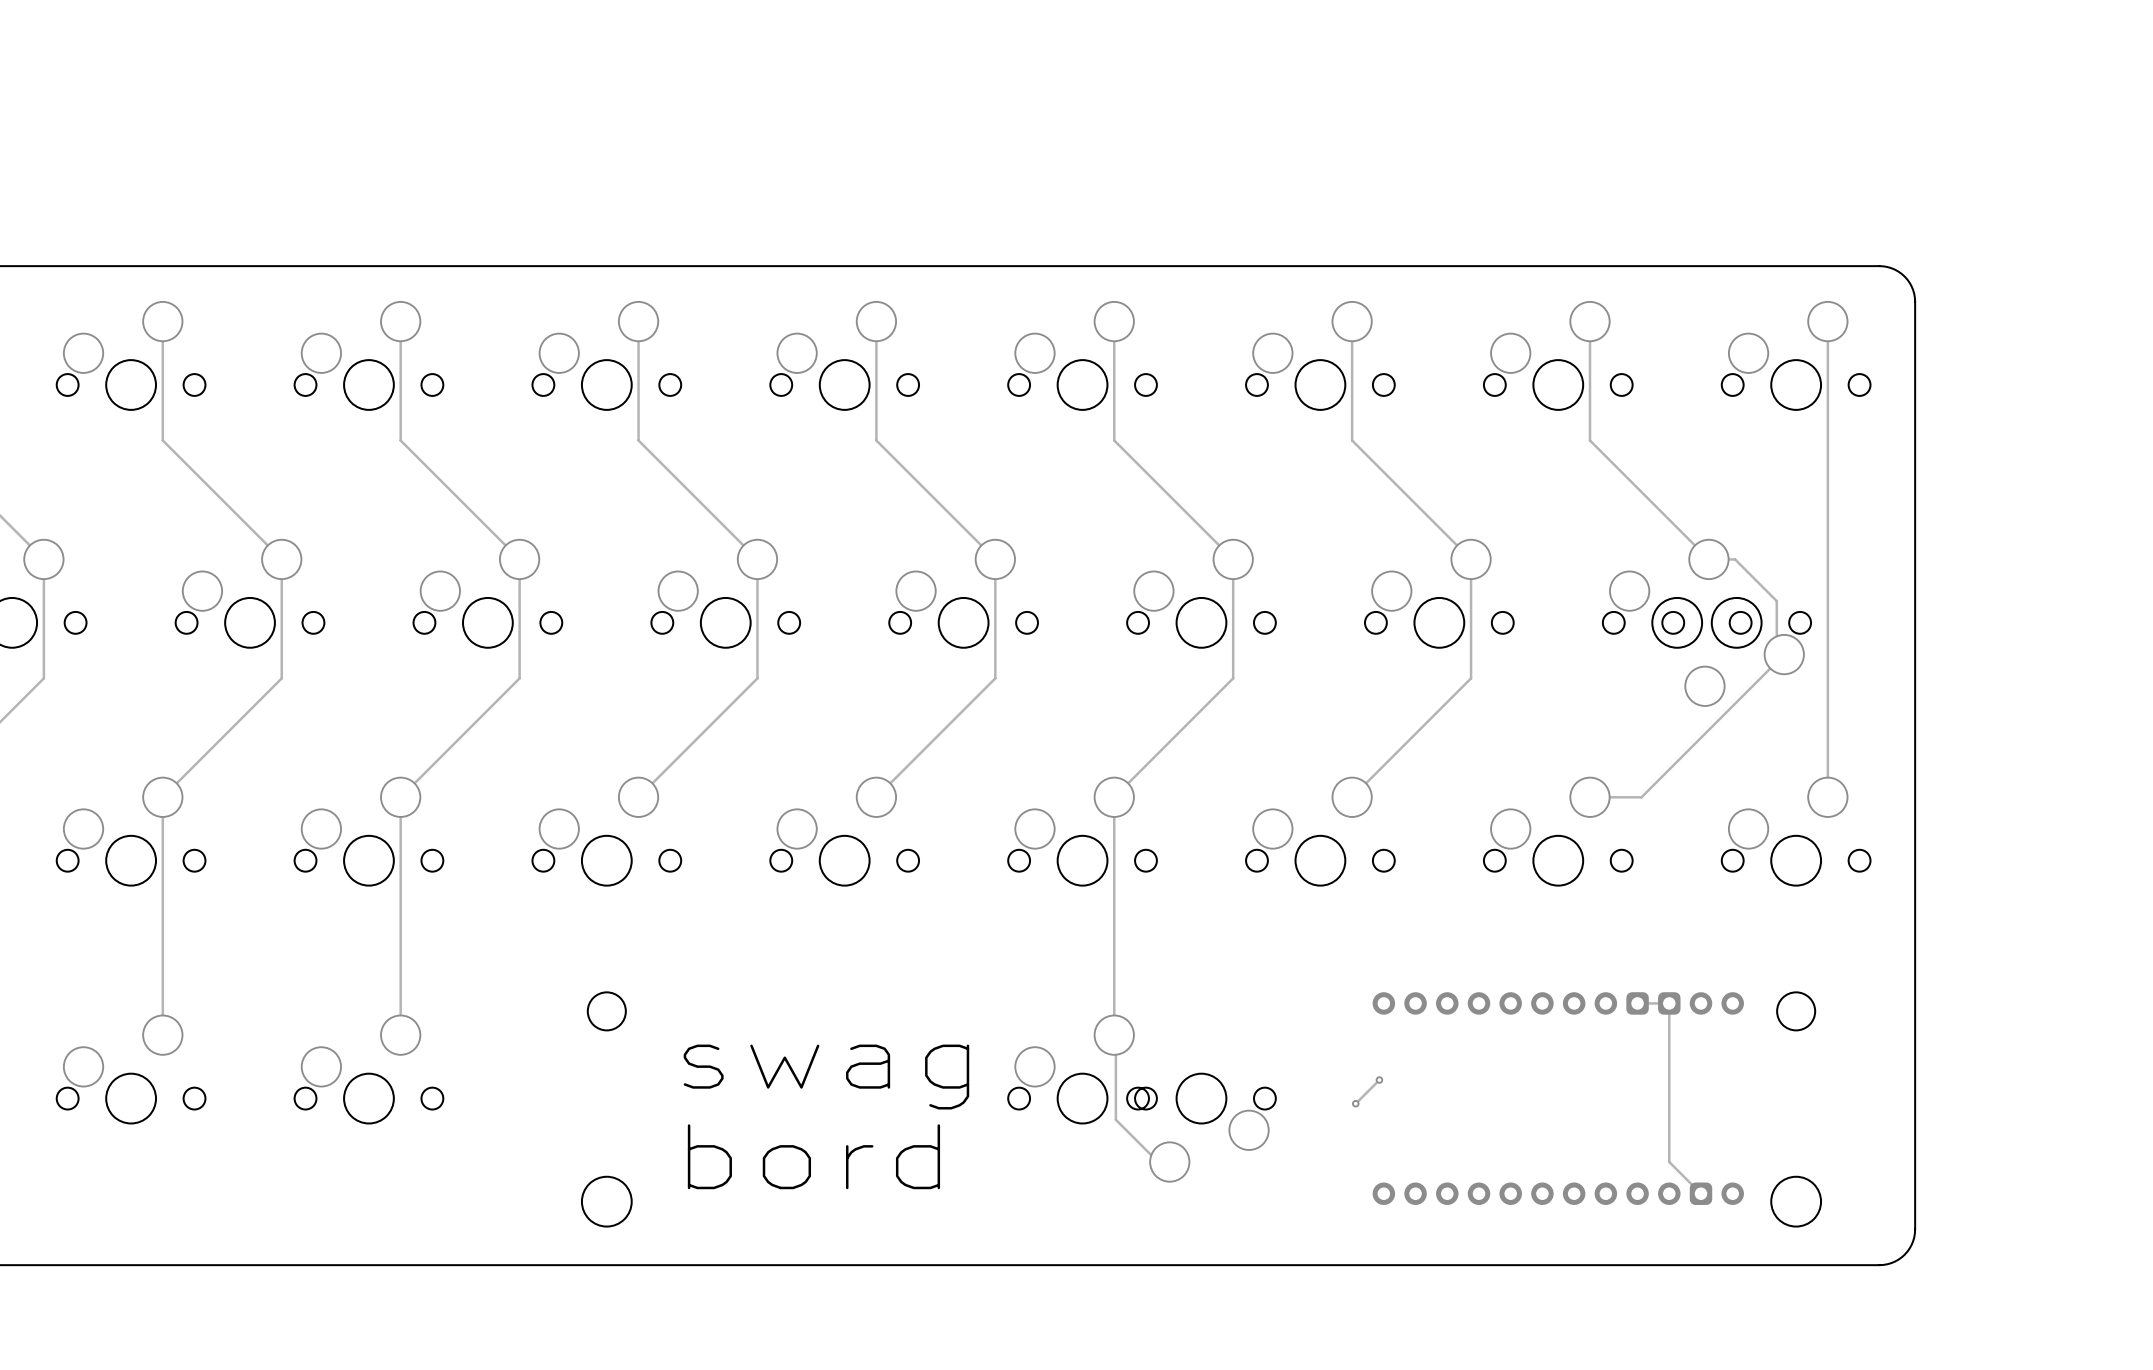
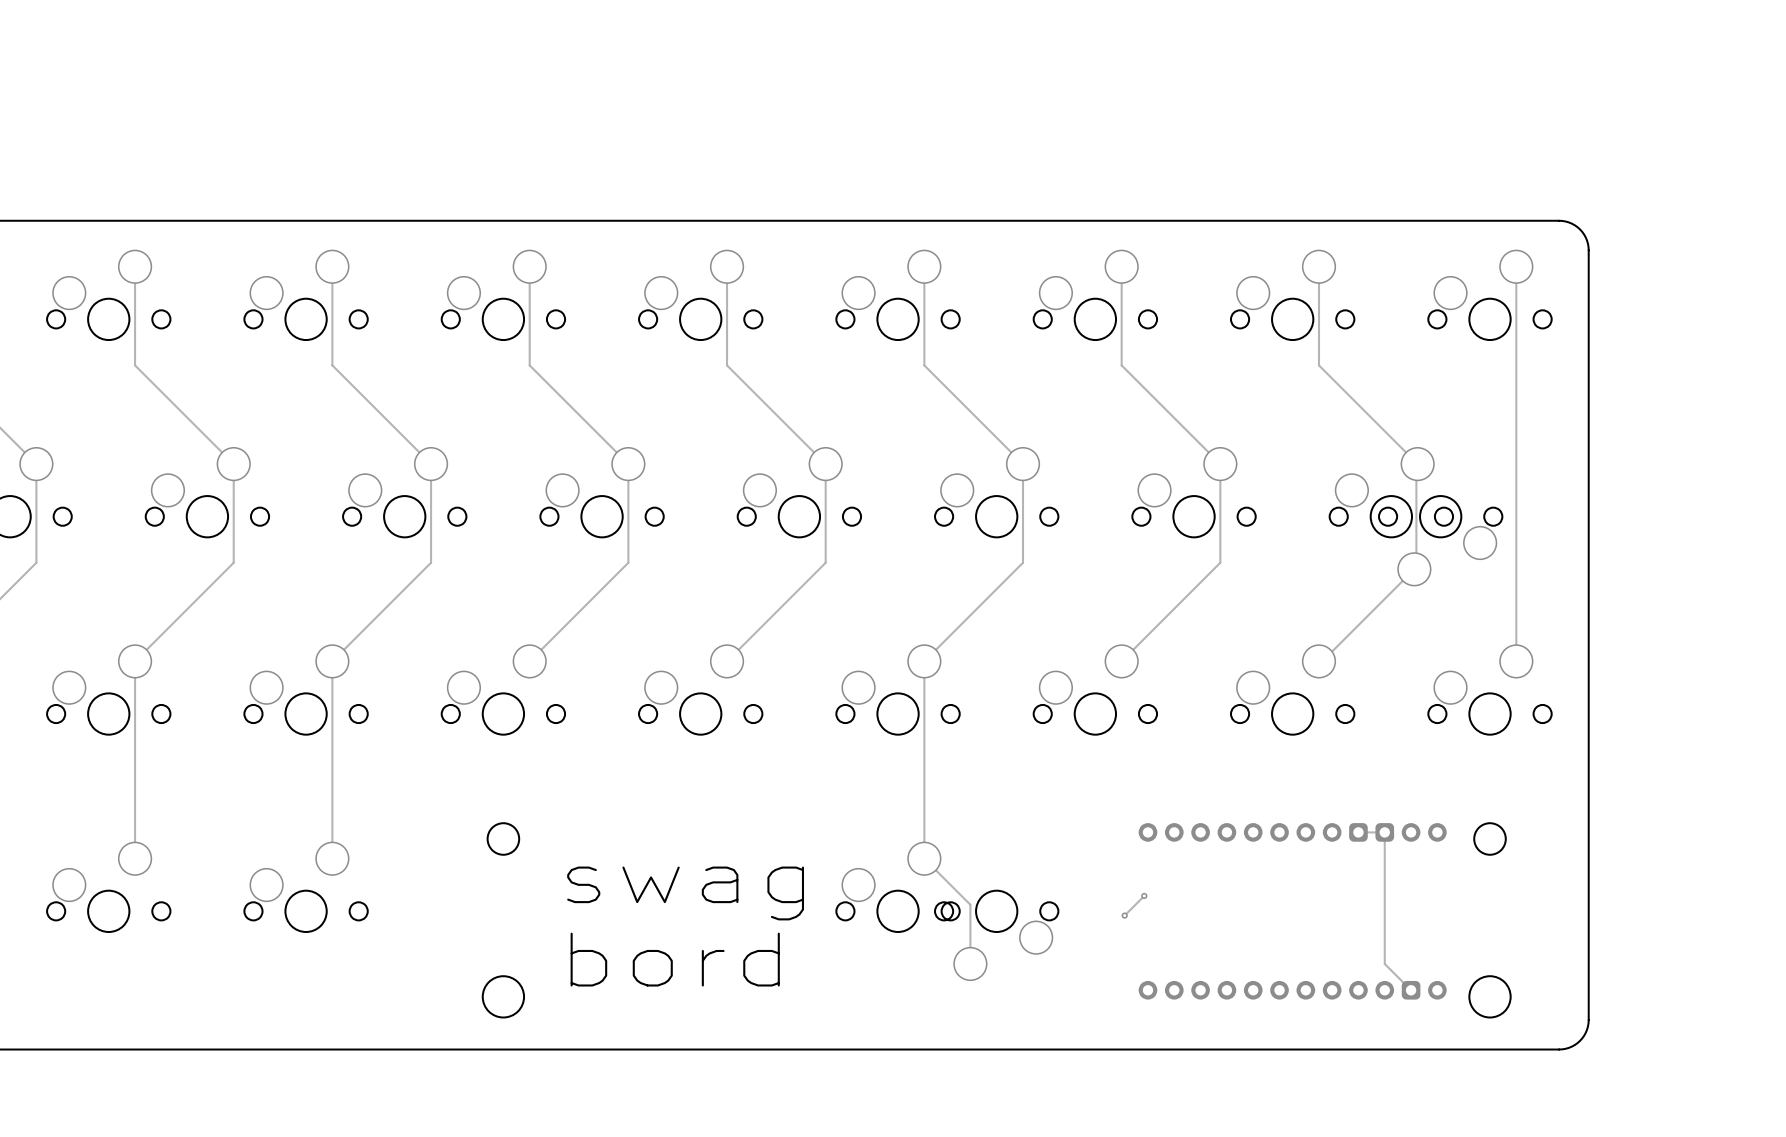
track: (1708, 559) (1735, 559) (1776, 601) (1776, 647) (1784, 654) (1641, 797) (1593, 797) -> (1414, 569) (1322, 661)
track: none -> (1416, 465) (1416, 567)
track: (1115, 1036) (1115, 1119) (1158, 1162) (1169, 1162) -> (925, 860) (970, 904) (970, 963)

